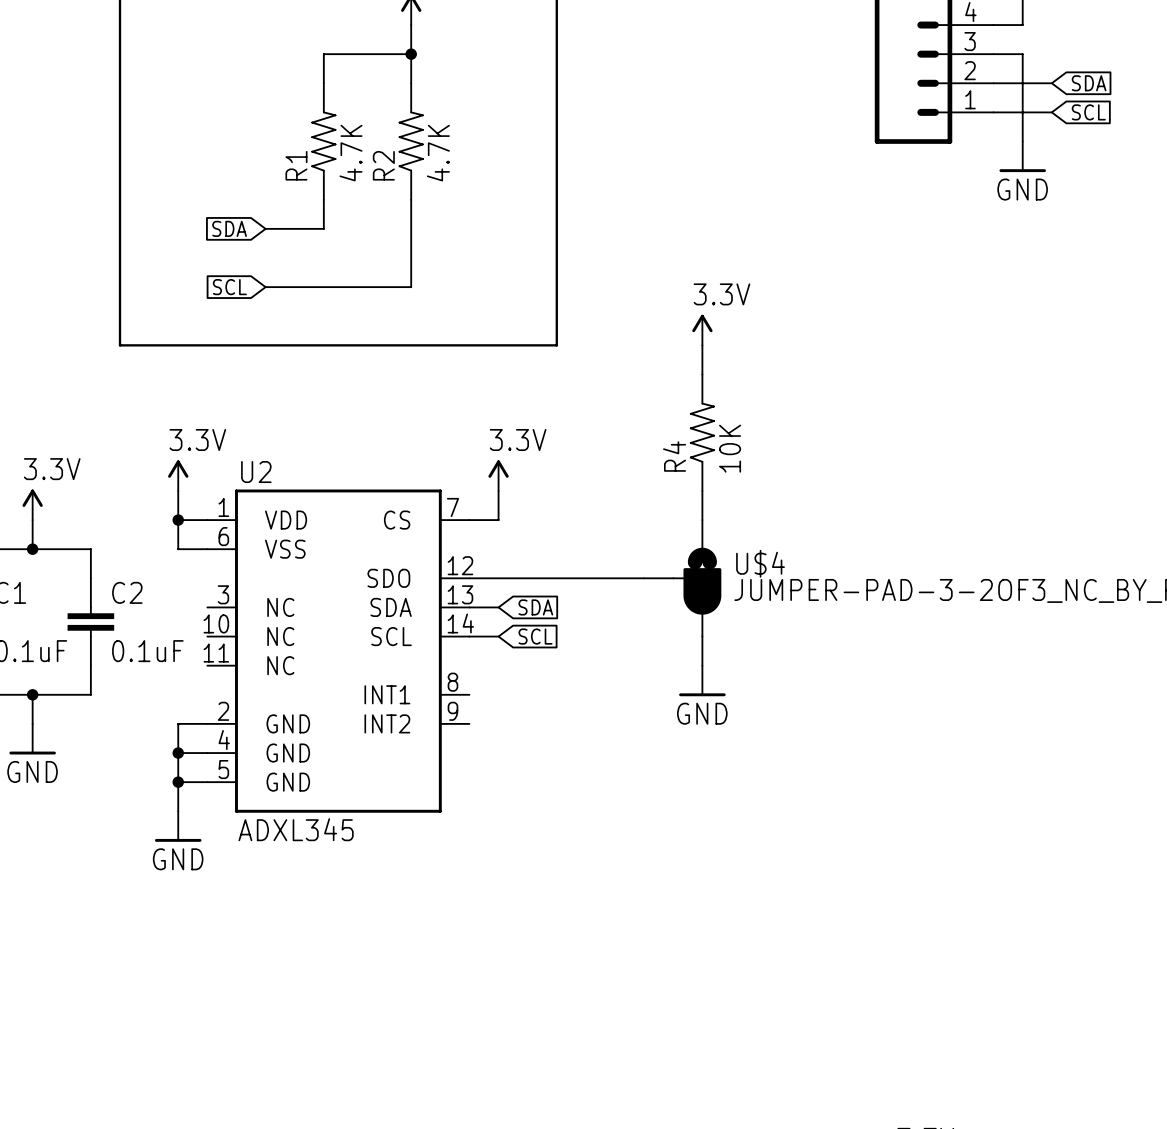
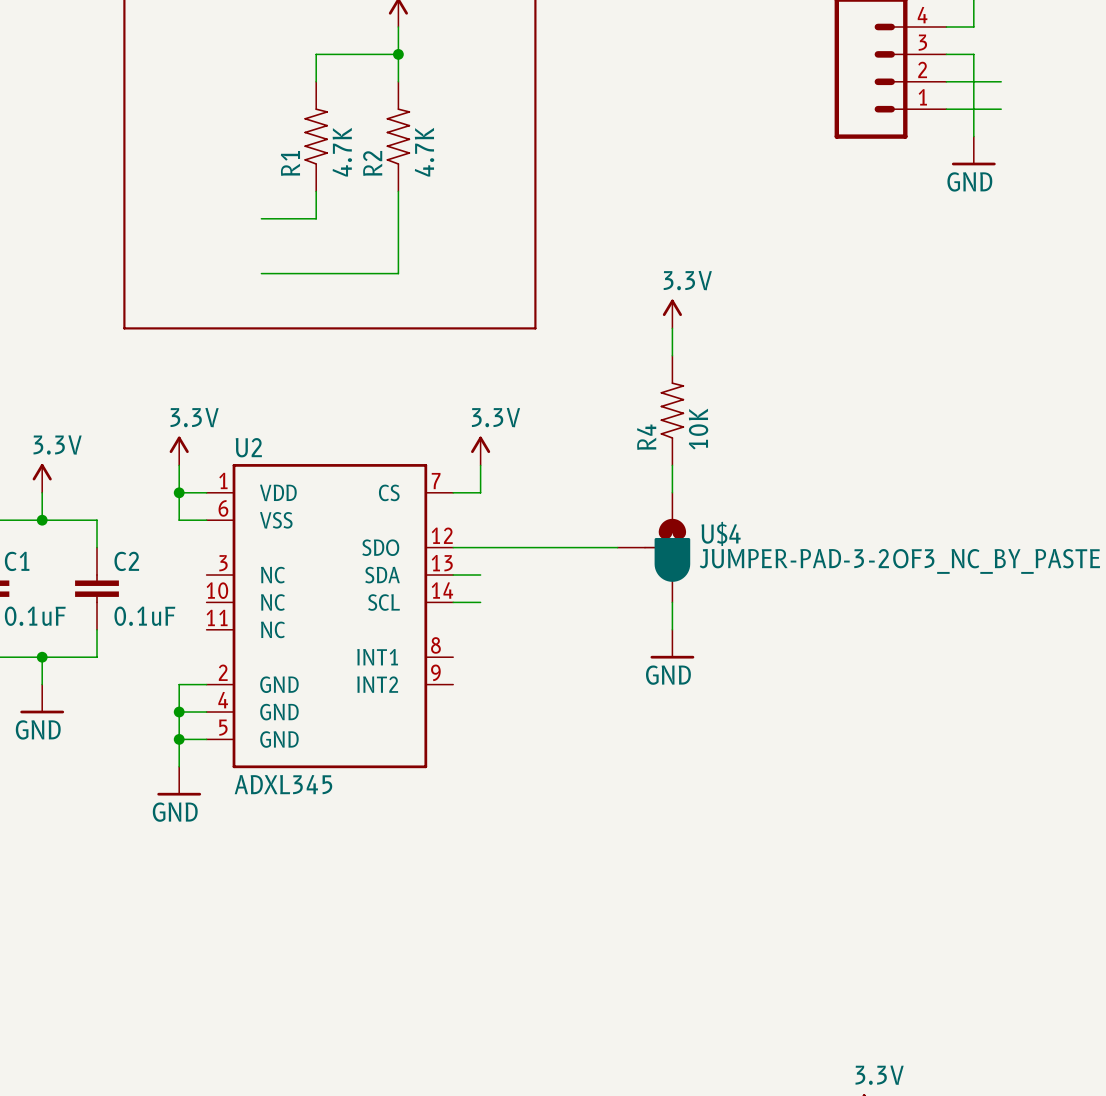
global label: SDA (1089, 83) -> none
global label: SCL (1088, 112) -> none
global label: SDA (229, 228) -> none
global label: SCL (229, 287) -> none
global label: SDA (535, 607) -> none
global label: SCL (535, 636) -> none

